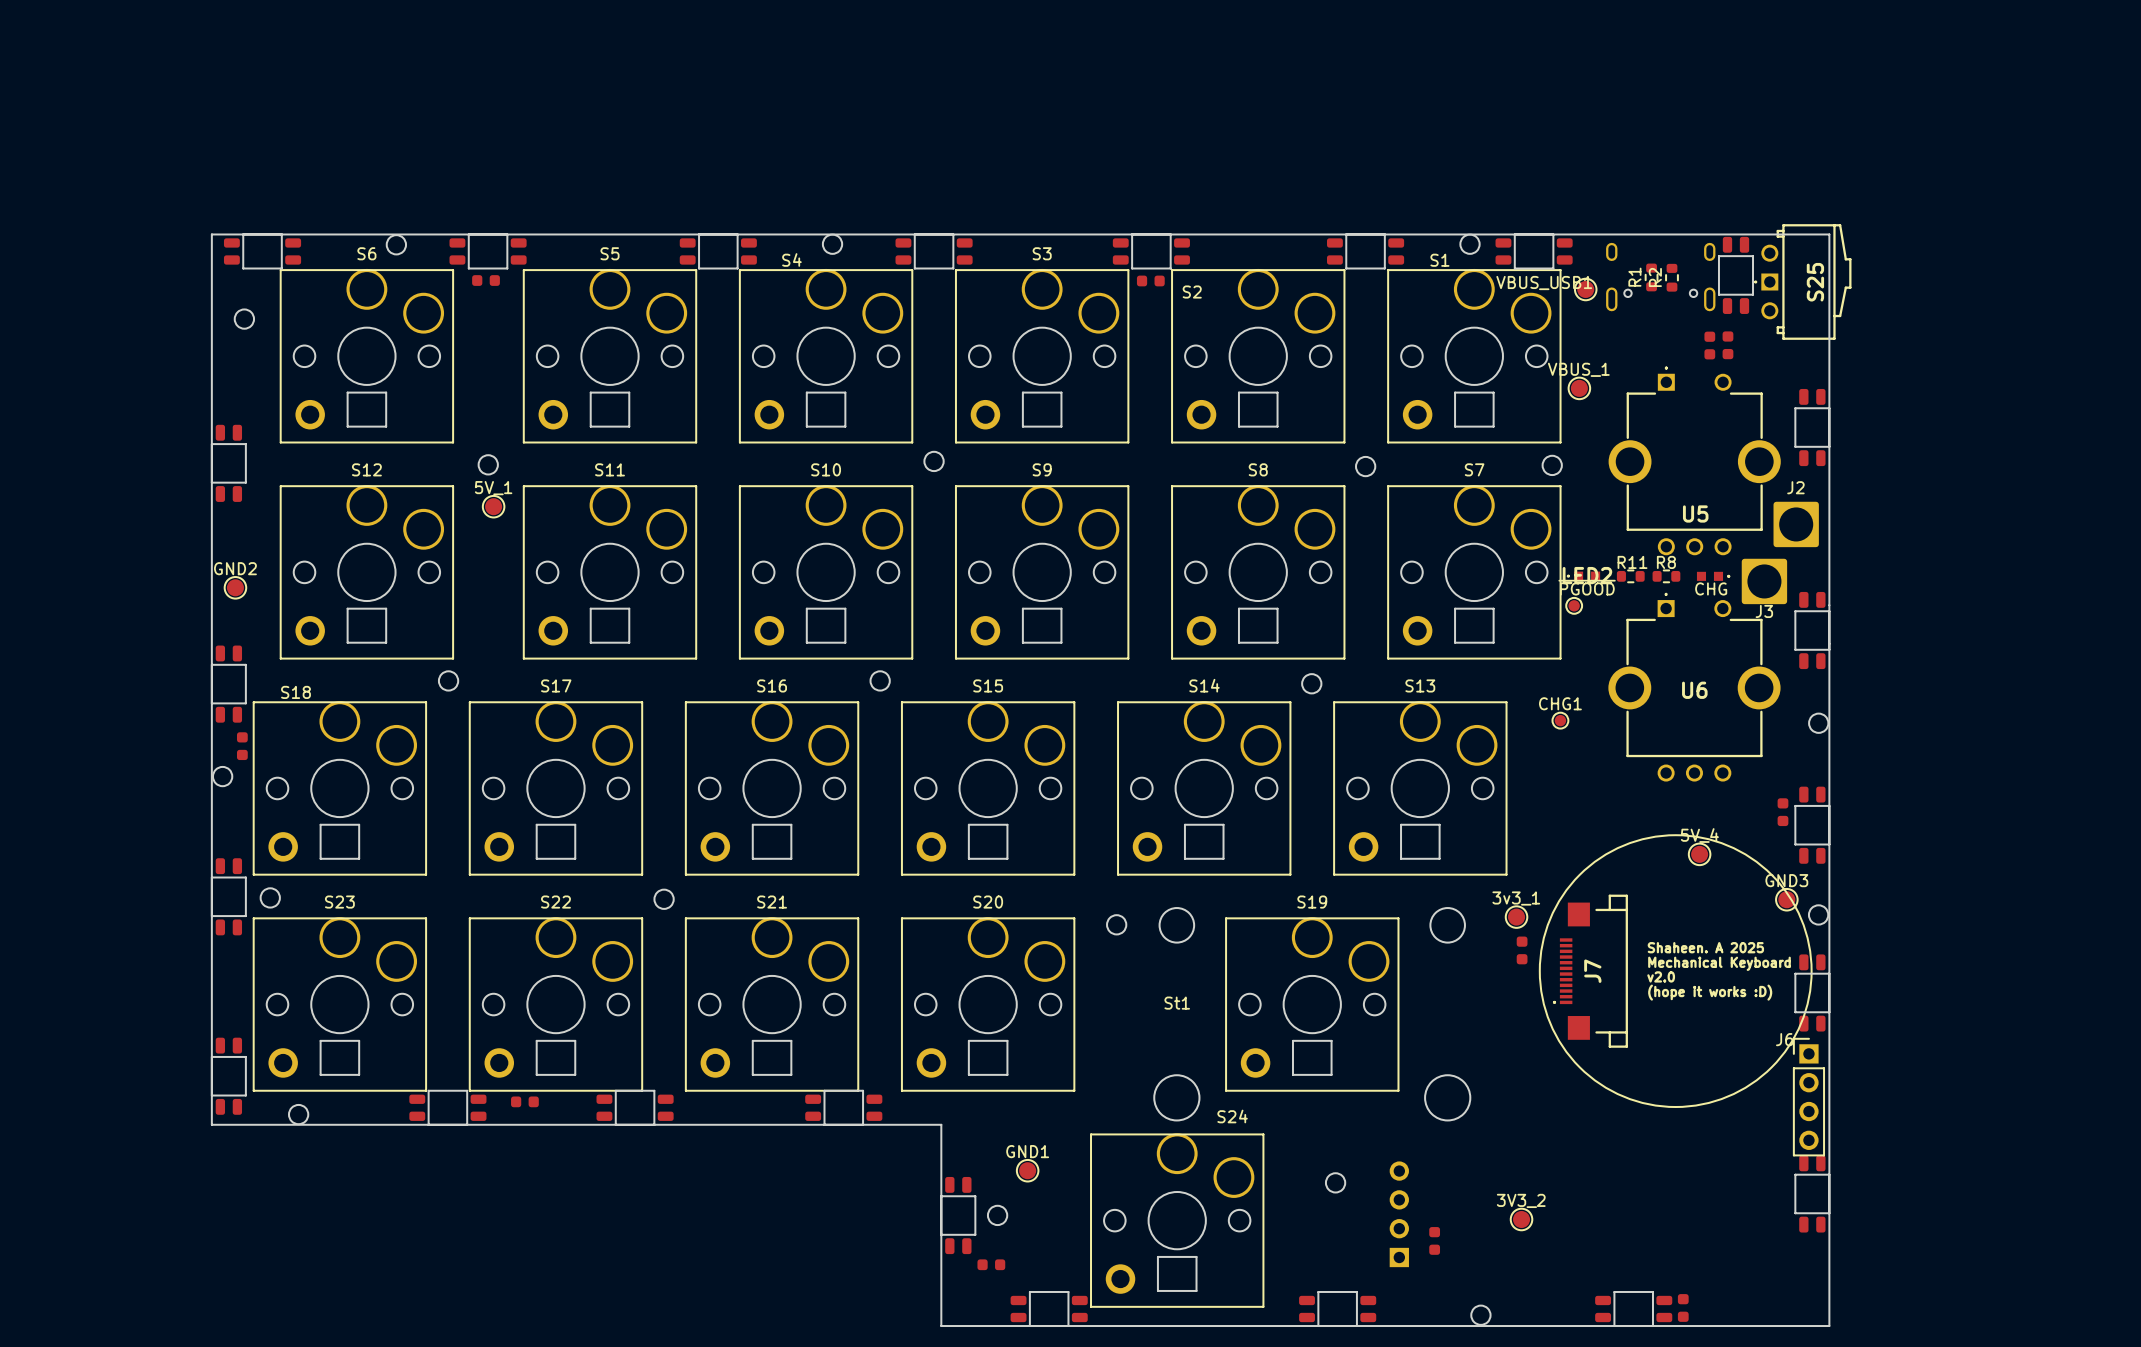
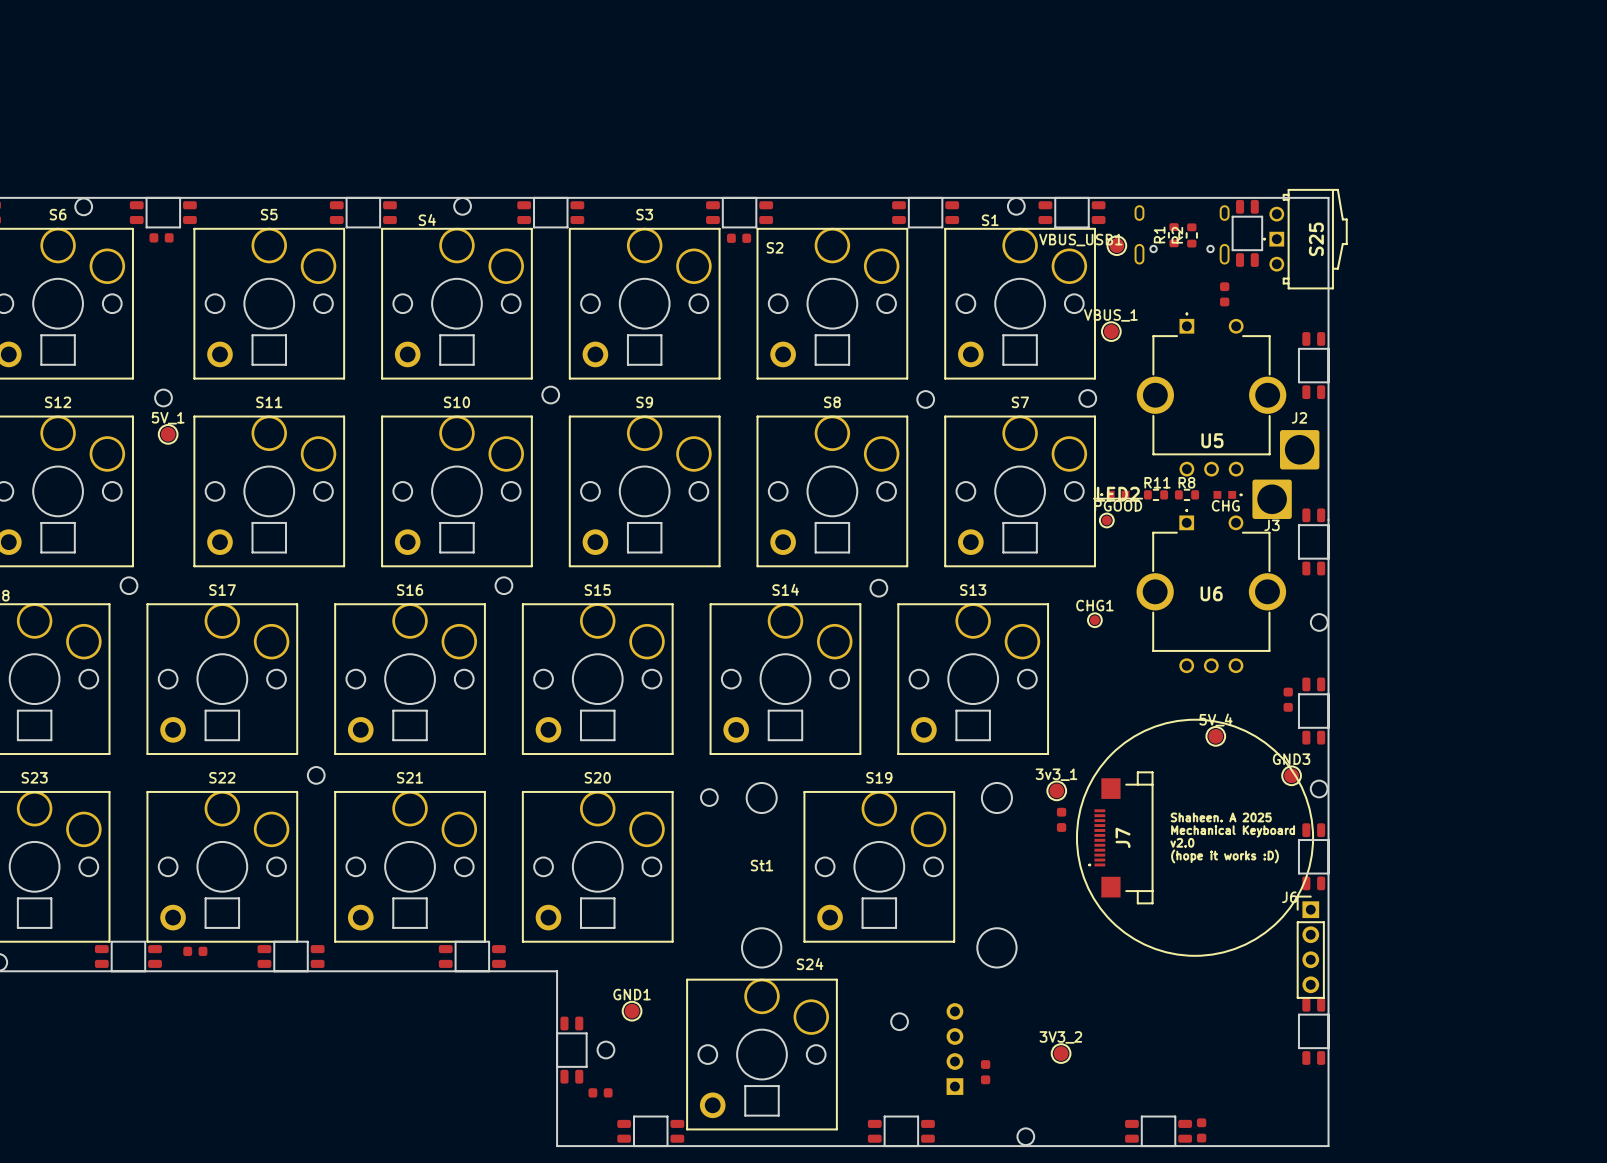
part: (1727, 345) -> none

